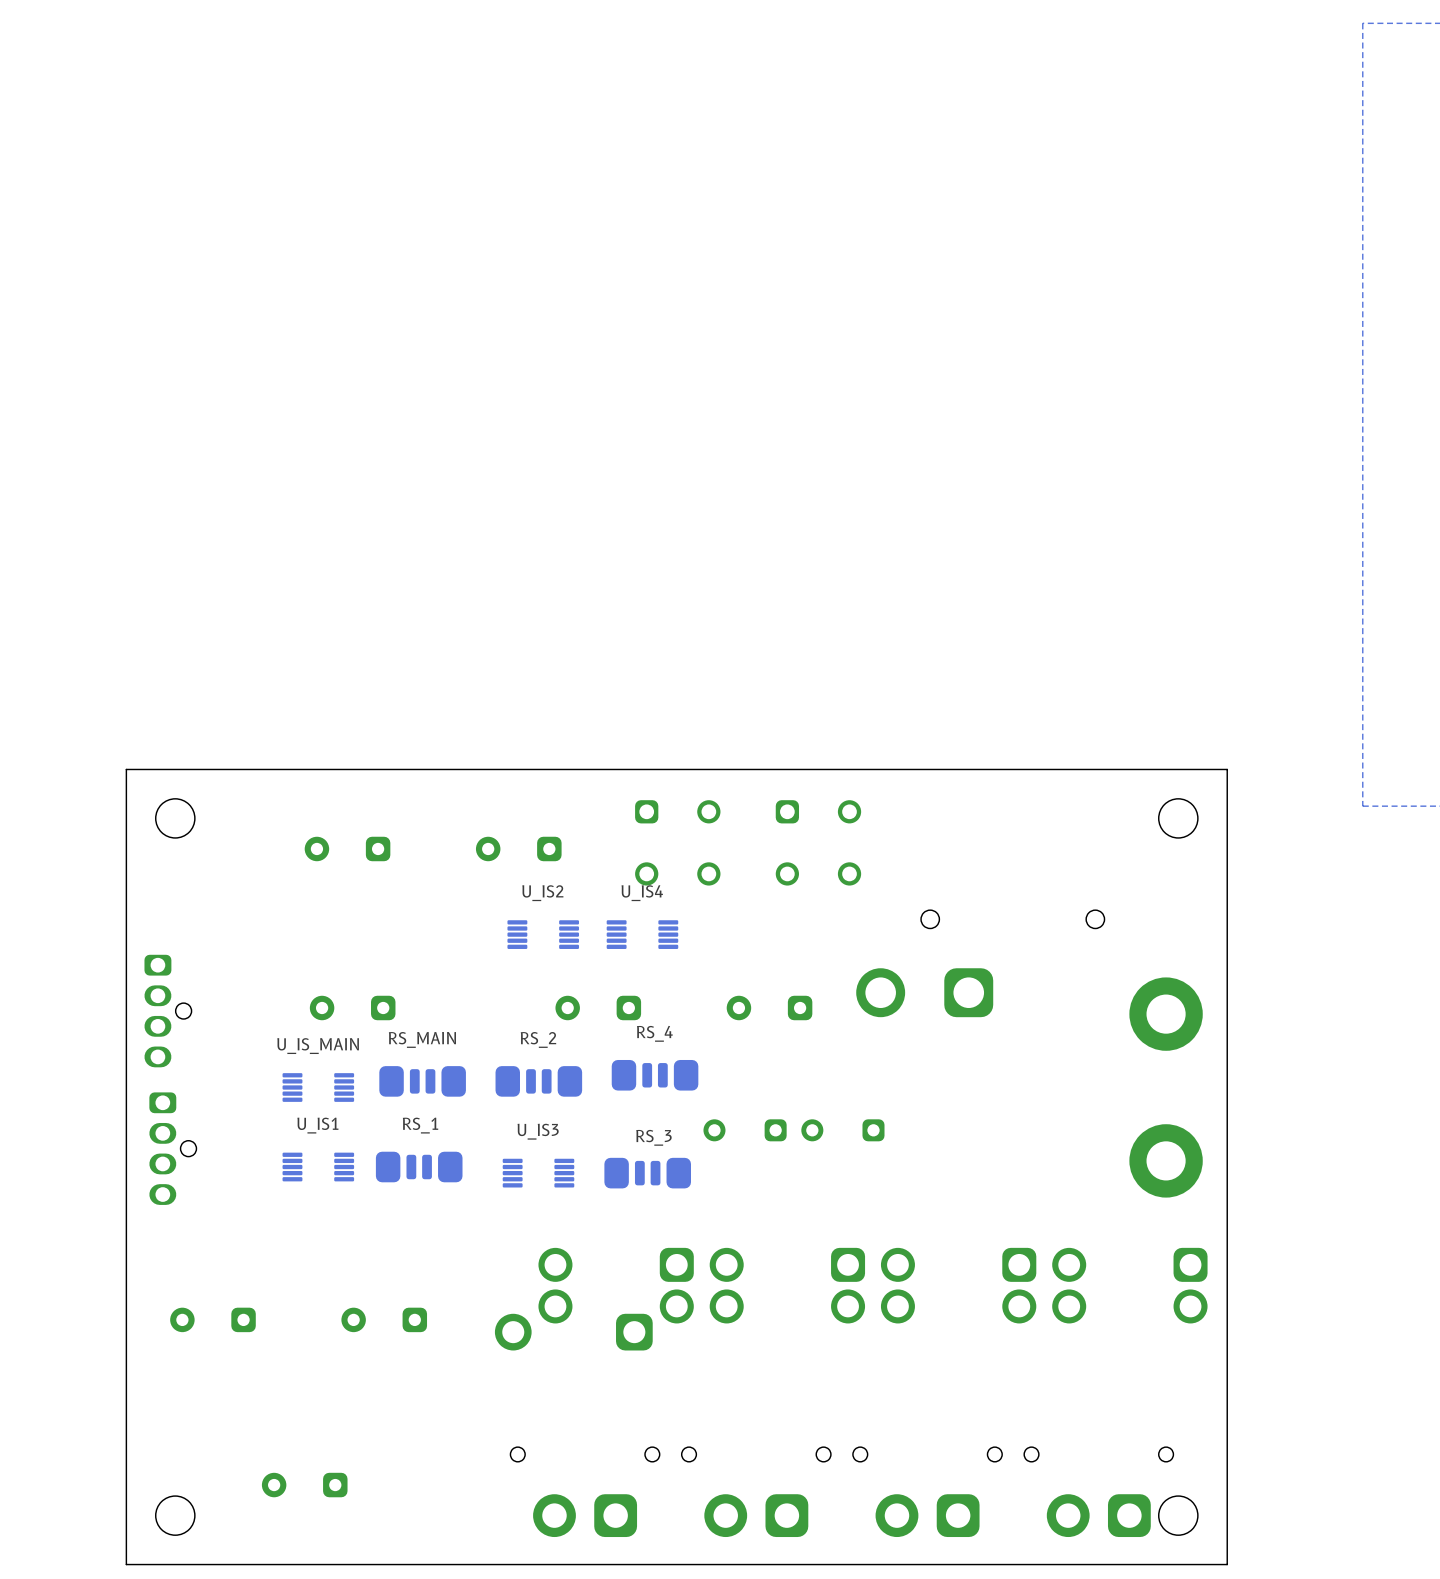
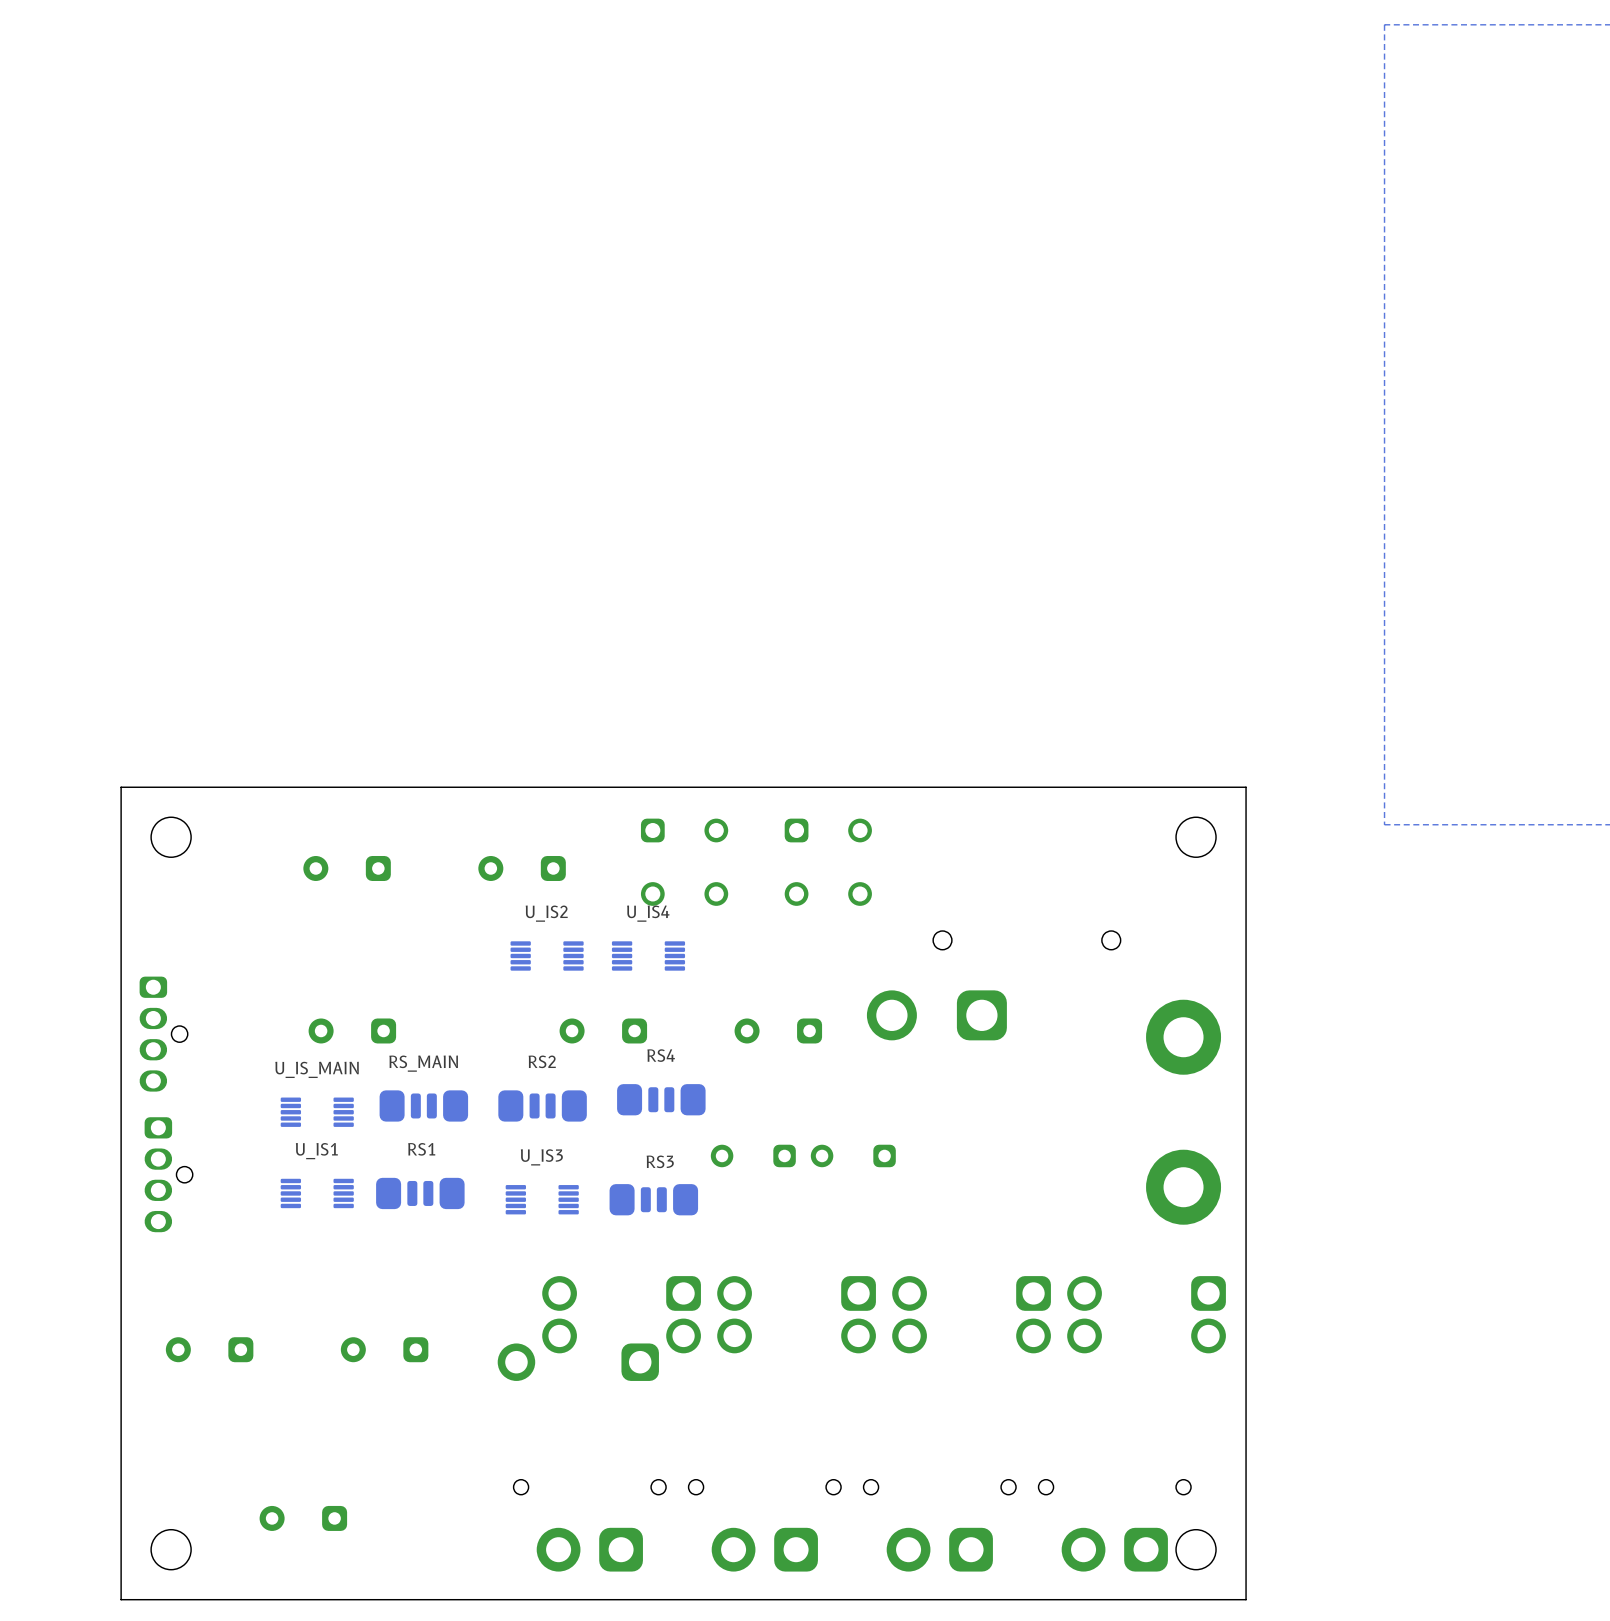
RS_4 name: RS_4 (654, 1033) -> RS4 (661, 1055)
RS_2 name: RS_2 (538, 1039) -> RS2 (542, 1061)
RS_1 name: RS_1 (420, 1125) -> RS1 (421, 1149)
RS_3 name: RS_3 (653, 1137) -> RS3 (660, 1161)

